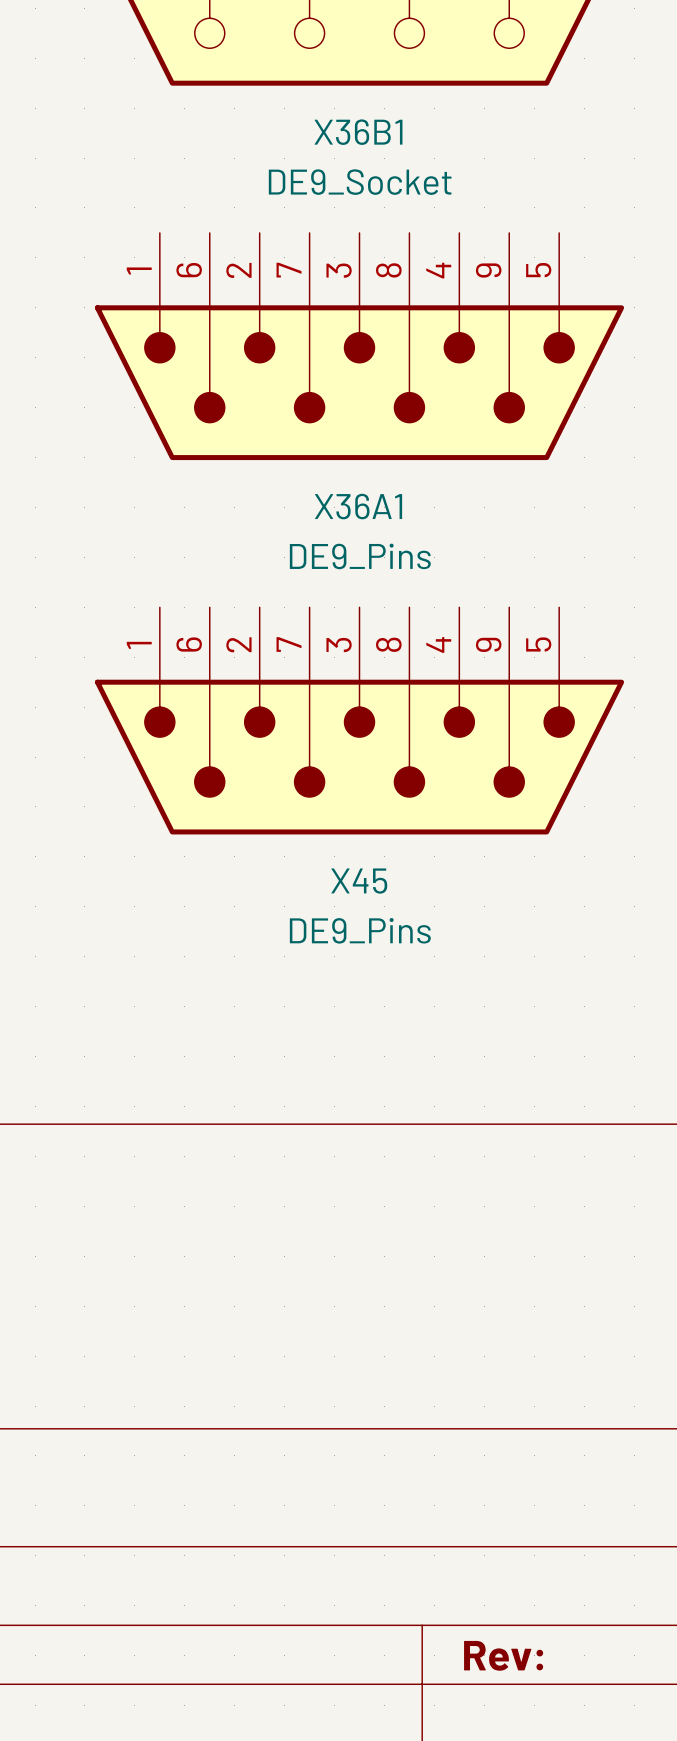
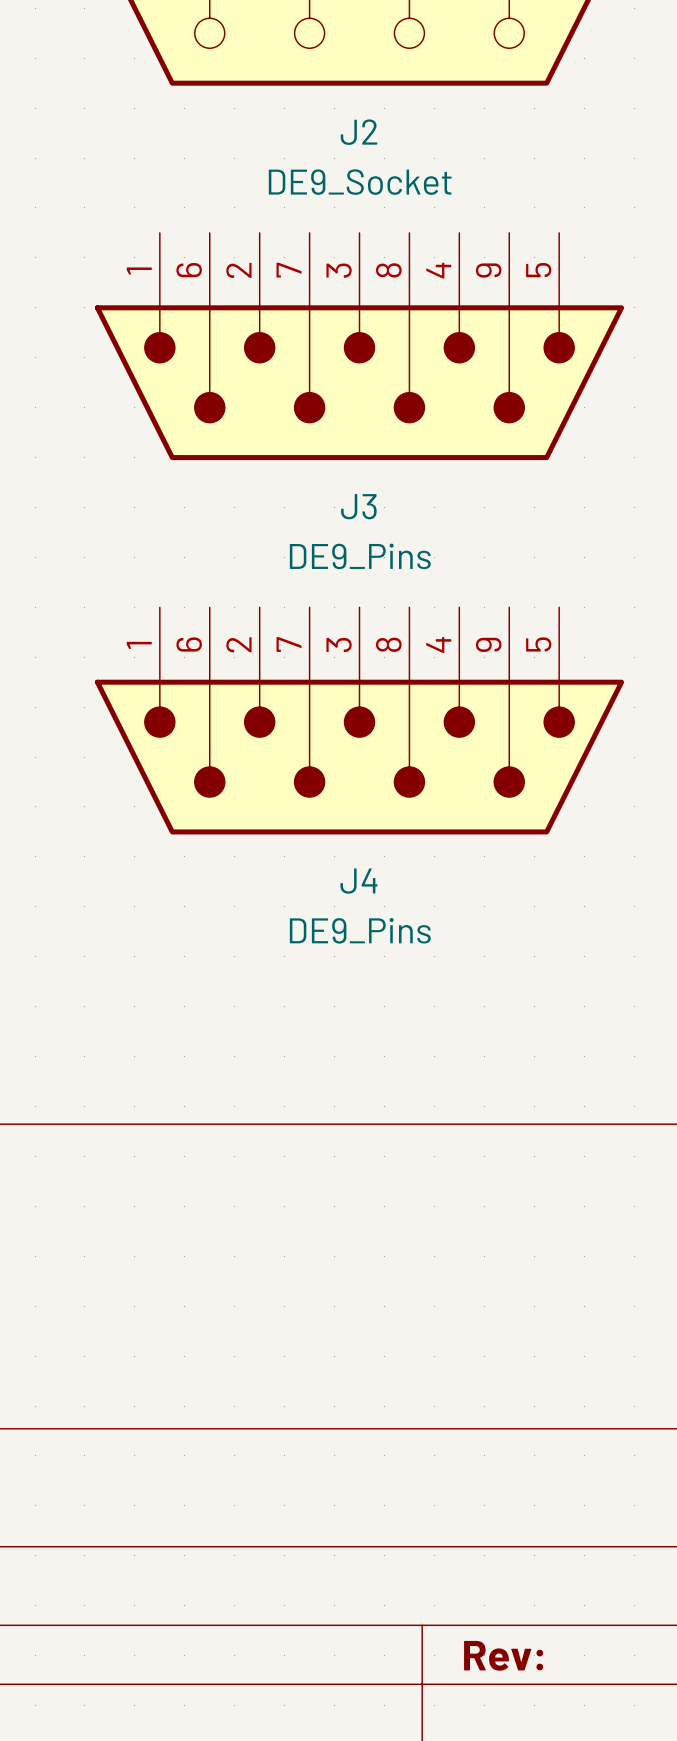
X36B1 name: X36B1 (358, 132) -> J2 (358, 132)
X36A1 name: X36A1 (358, 506) -> J3 (358, 506)
X45 name: X45 (359, 881) -> J4 (358, 881)

